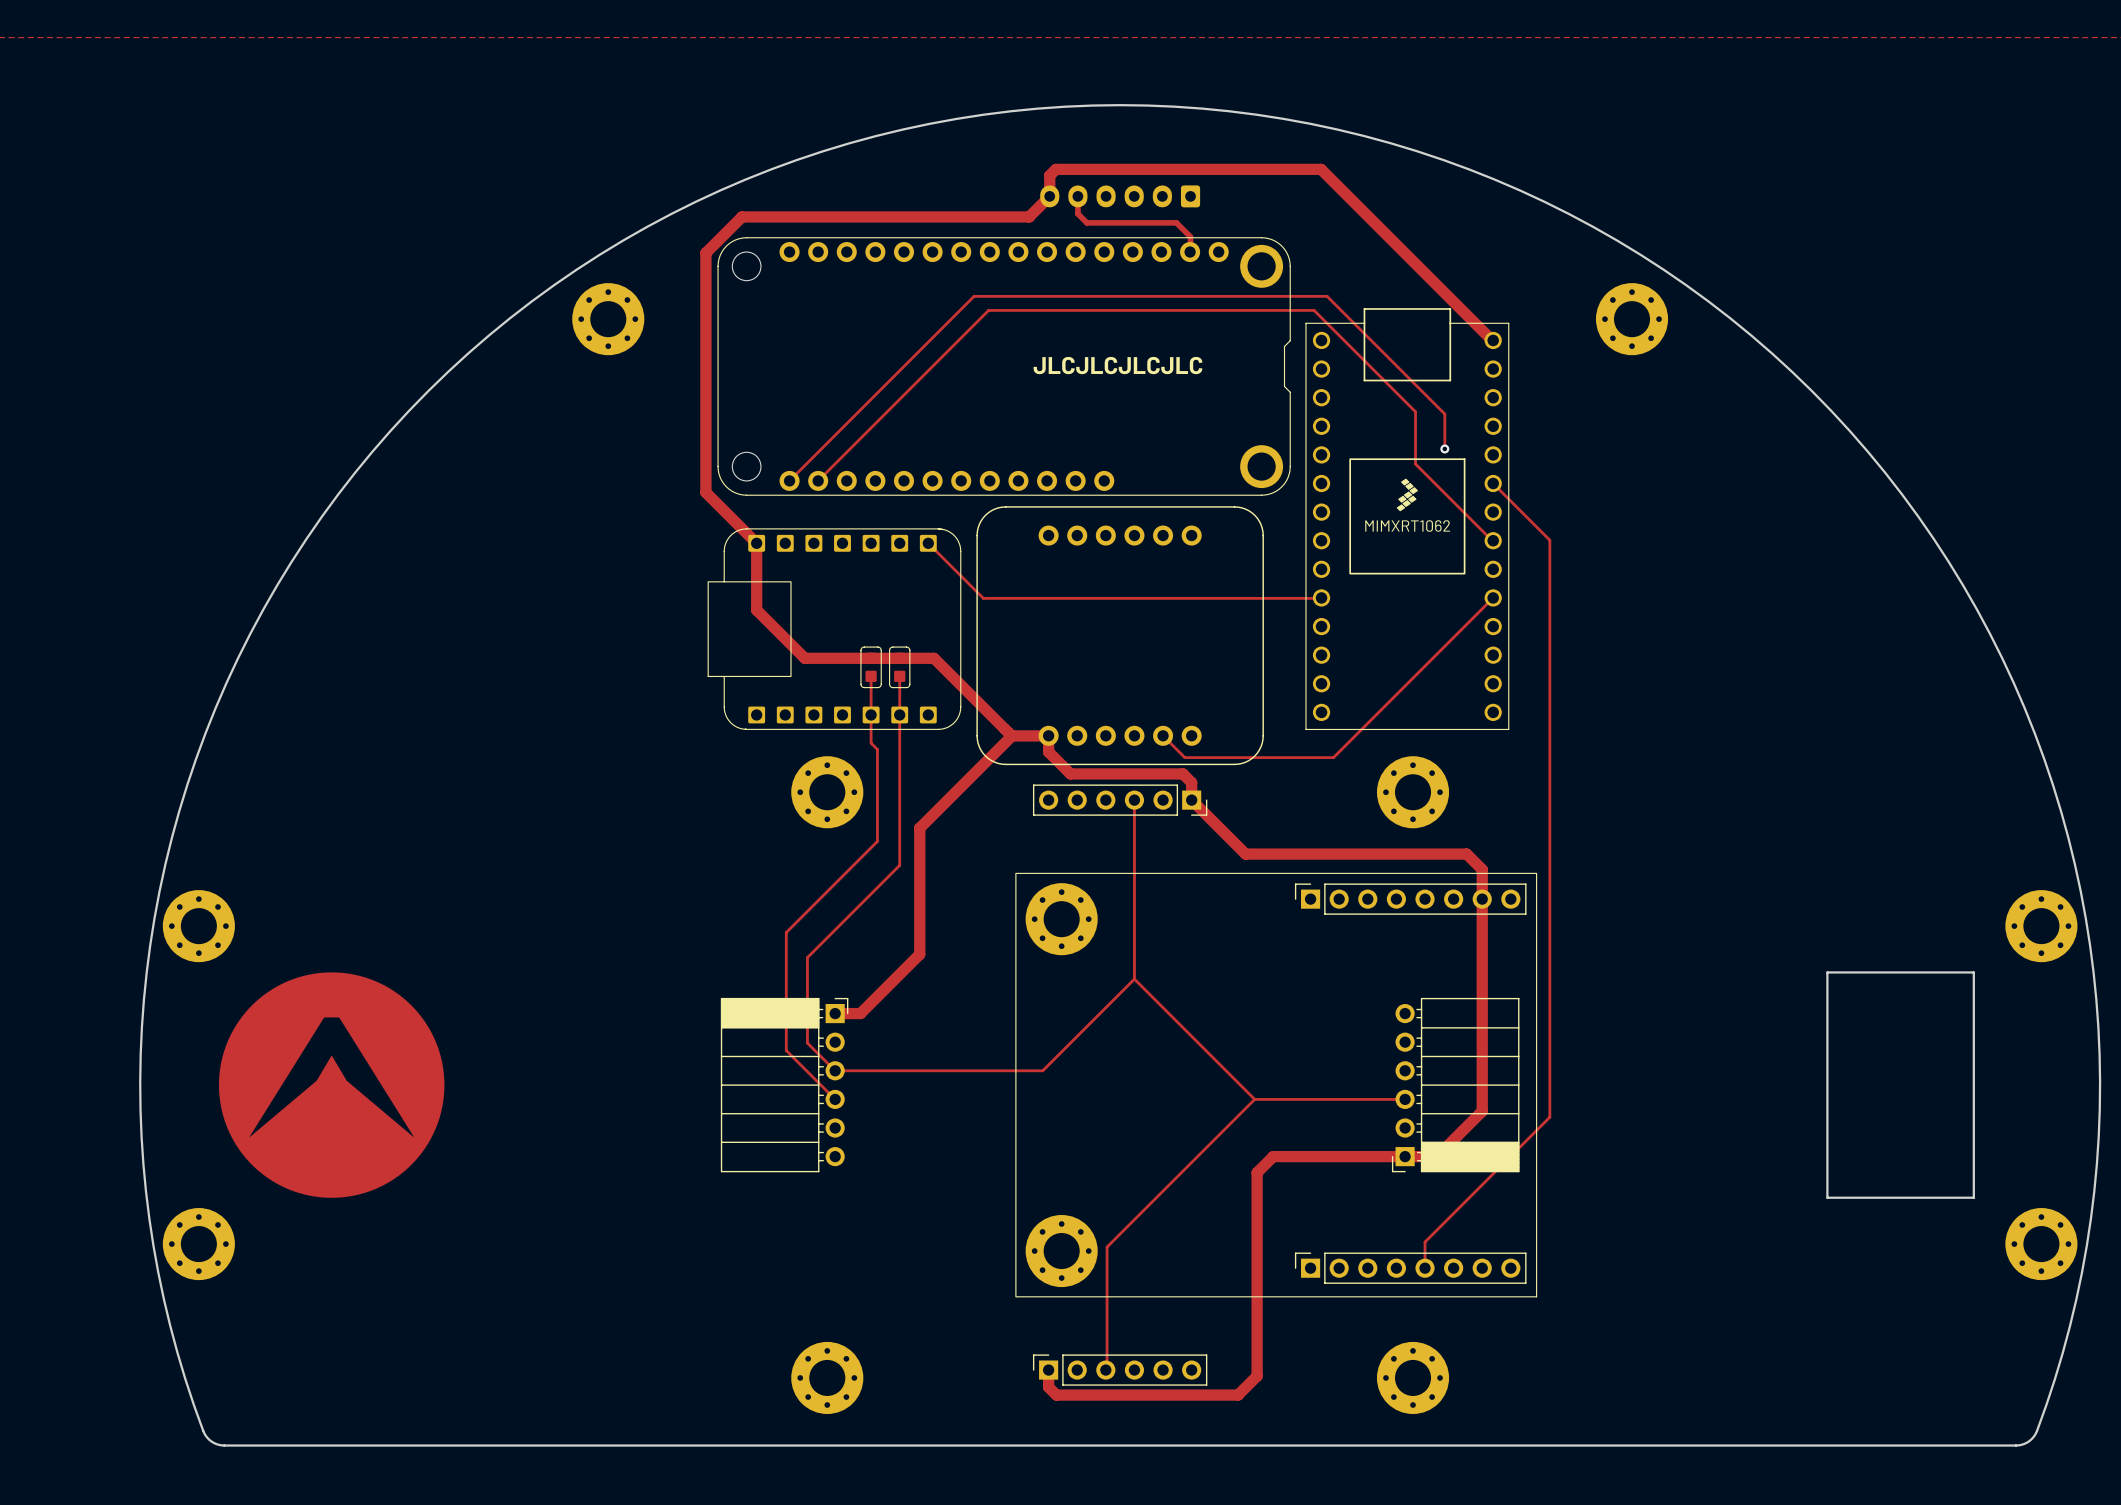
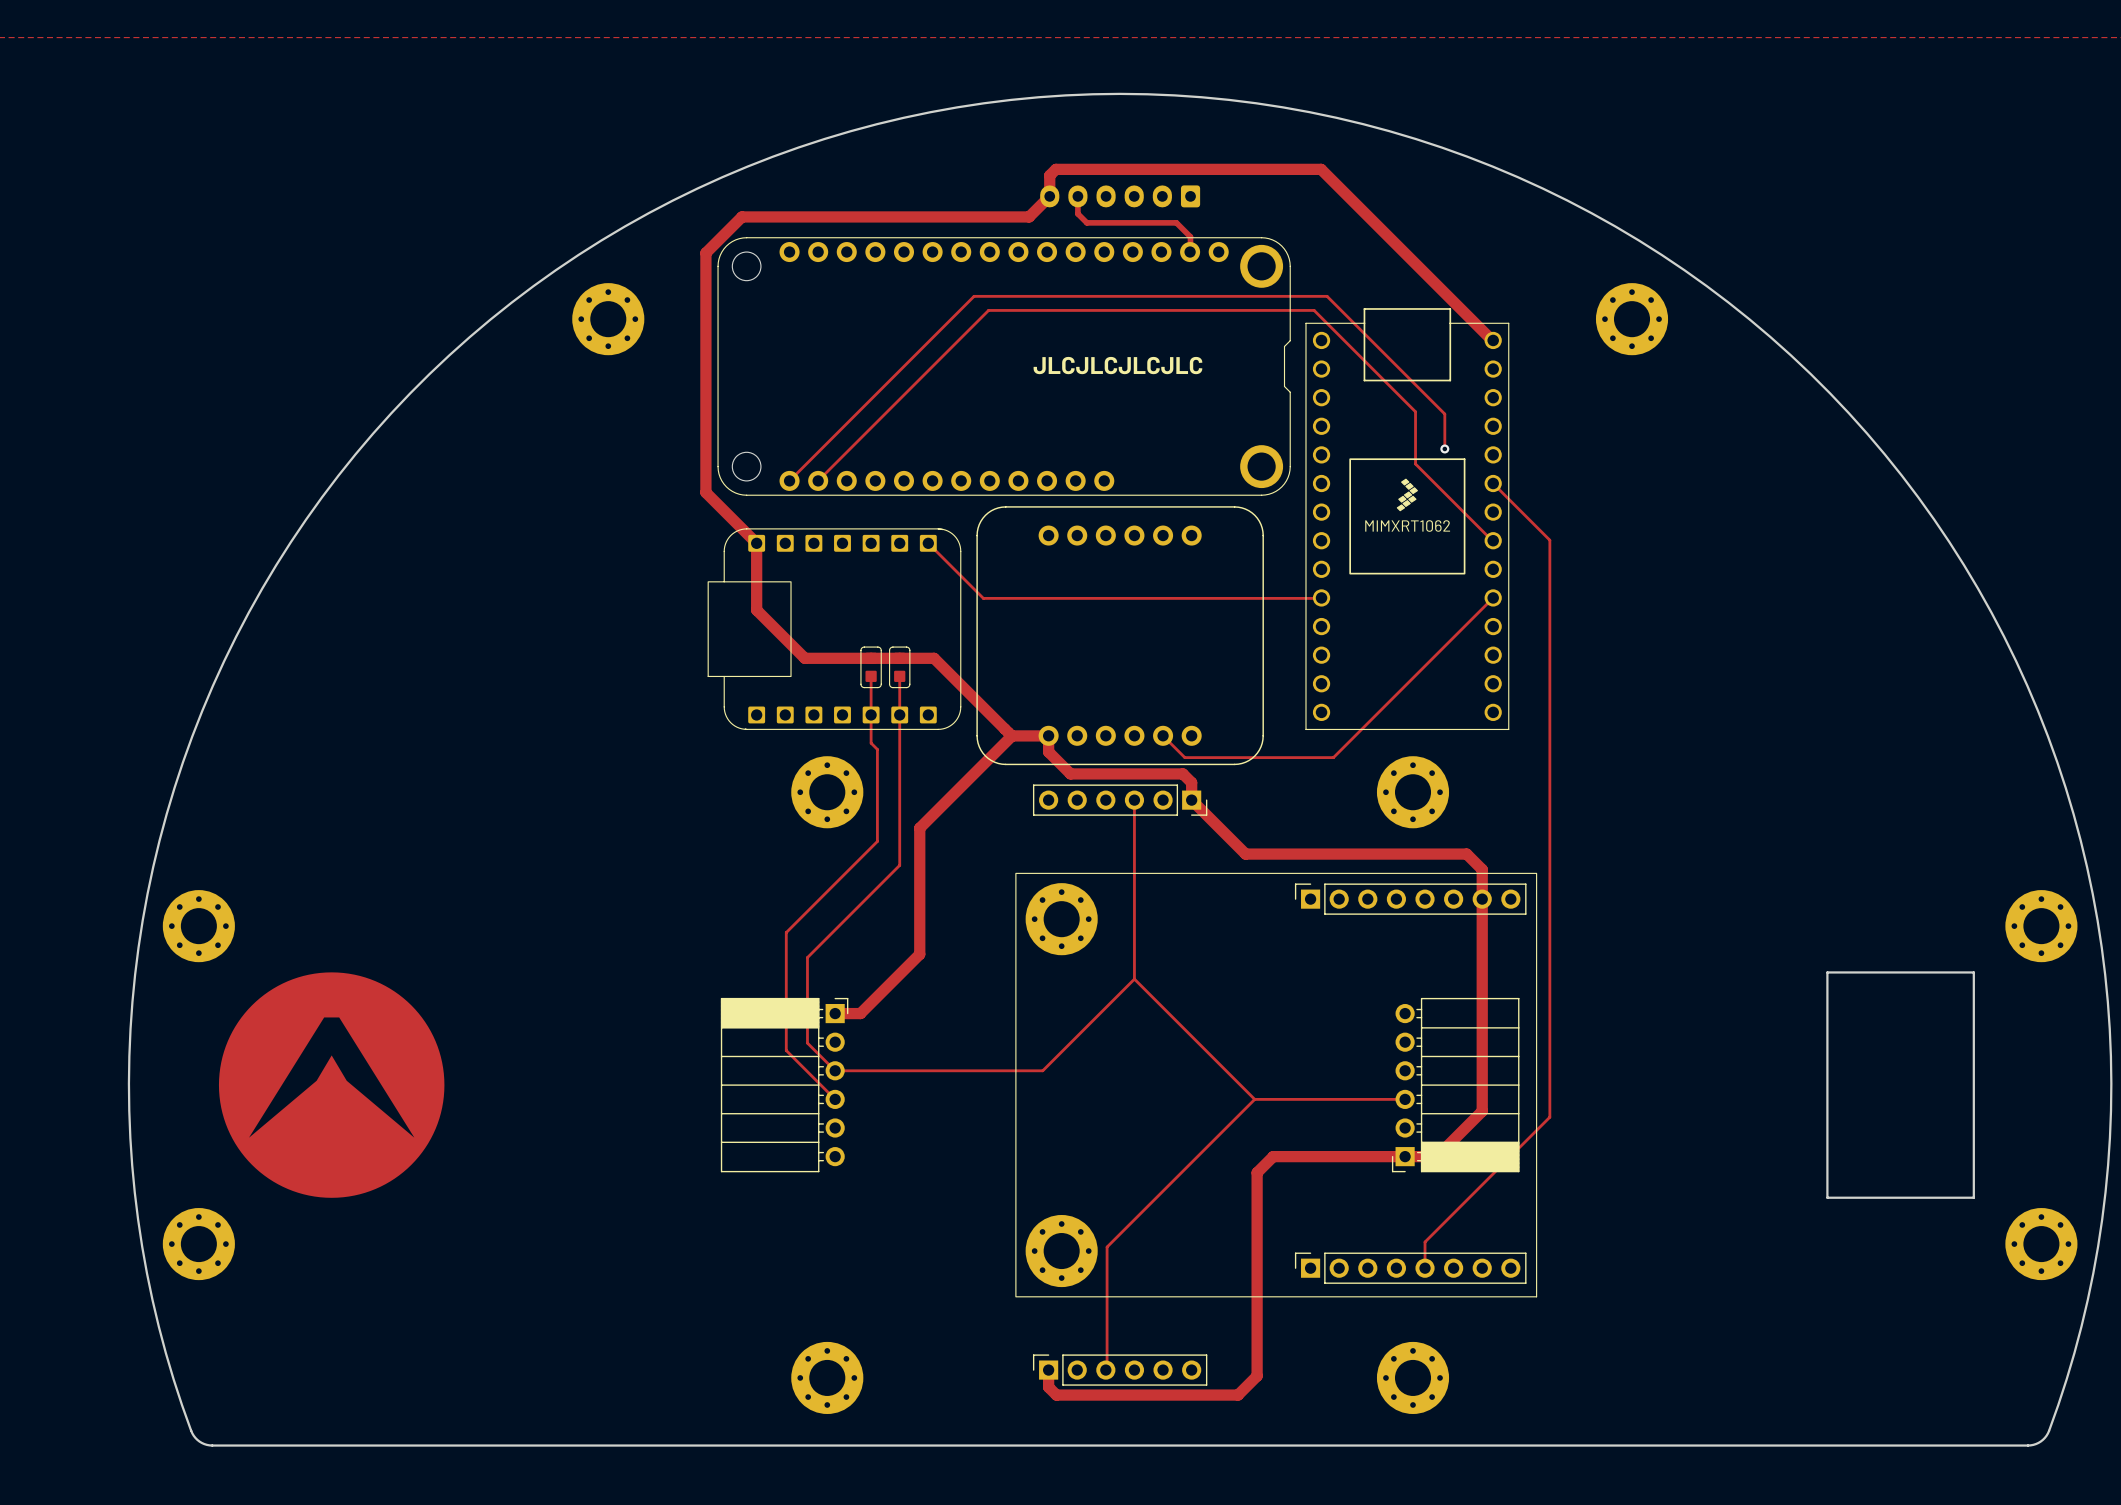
board edge: (224, 1445) (213, 1442) (205, 1435) (193, 1405) (170, 1326) (153, 1245) (146, 1191) (141, 1136) (140, 1081) (143, 999) (150, 945) (159, 891) (171, 837) (196, 759) (226, 682) (250, 633) (277, 585) (306, 539) (338, 494) (372, 451) (409, 410) (468, 353) (510, 318) (576, 269) (623, 240) (671, 214) (720, 190) (771, 169) (823, 151) (902, 129) (956, 118) (1010, 111) (1065, 106) (1120, 105) (1202, 108) (1256, 114) (1310, 123) (1364, 136) (1417, 151) (1468, 169) (1519, 190) (1569, 214) (1617, 240) (1663, 269) (1708, 301) (1772, 353) (1811, 391) (1849, 430) (1885, 472) (1933, 539) (1963, 585) (2002, 657) (2024, 707) (2044, 759) (2061, 811) (2074, 864) (2085, 918) (2096, 999) (2099, 1054) (2099, 1109) (2096, 1164) (2086, 1245) (2069, 1326) (2046, 1405) (2034, 1435) (2026, 1442) (2015, 1445) -> (224, 1445) (204, 1444) (192, 1433) (165, 1353) (146, 1273) (138, 1219) (130, 1138) (129, 1056) (132, 1001) (142, 920) (153, 867) (166, 814) (183, 762) (202, 711) (236, 636) (262, 588) (290, 542) (322, 497) (355, 454) (391, 413) (449, 355) (490, 319) (533, 286) (601, 240) (648, 213) (697, 188) (772, 156) (824, 139) (877, 124) (930, 112) (984, 103) (1065, 95) (1120, 93) (1174, 95) (1229, 99) (1283, 107) (1363, 124) (1415, 139) (1467, 156) (1542, 188) (1591, 213) (1638, 240) (1684, 270) (1749, 319) (1790, 355) (1830, 393) (1884, 454) (1918, 497) (1949, 542) (1978, 588) (2016, 661) (2038, 711) (2057, 762) (2073, 814) (2087, 867) (2097, 920) (2107, 1001) (2111, 1083) (2109, 1138) (2102, 1219) (2093, 1273) (2074, 1353) (2047, 1433) (2036, 1444) (2015, 1445)

